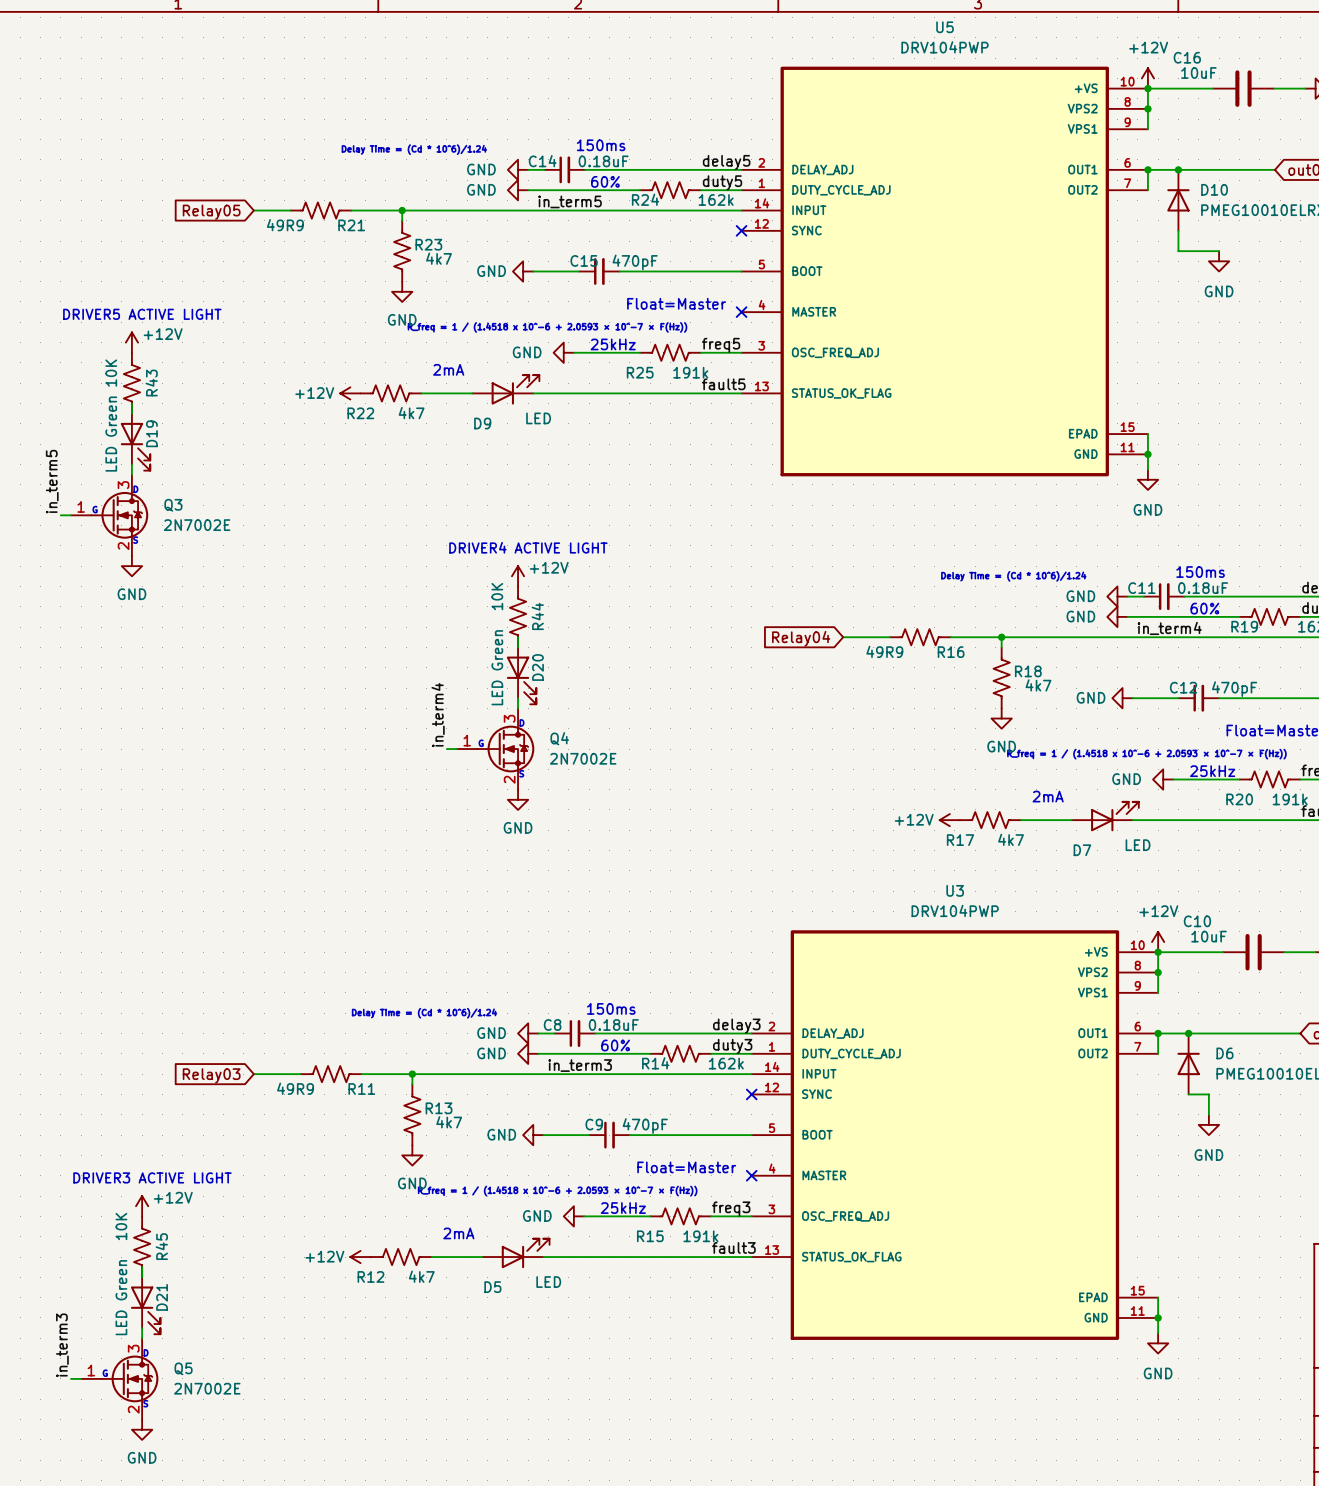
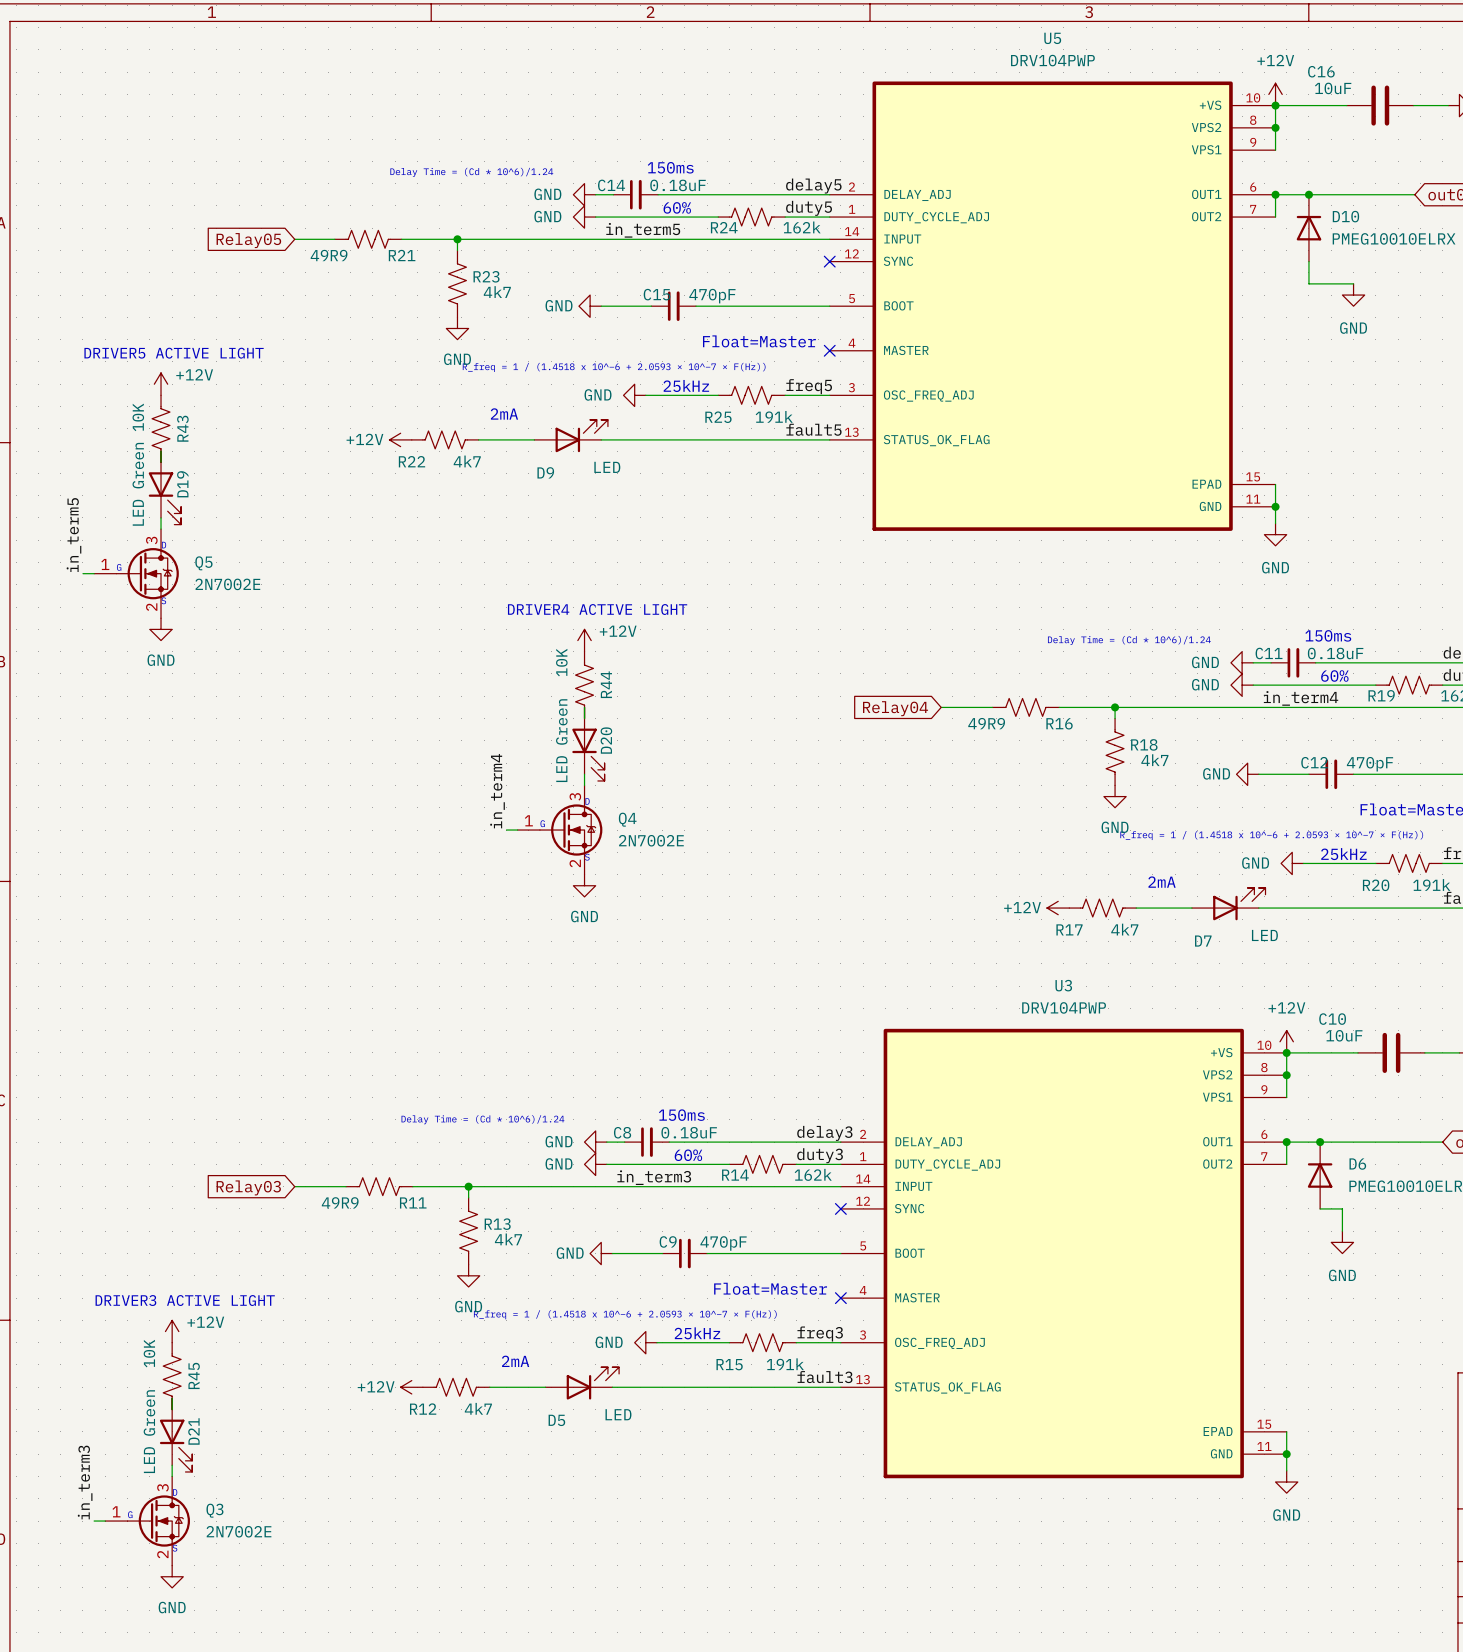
Q3 name: Q3 (173, 505) -> Q5 (203, 563)
Q5 name: Q5 (183, 1368) -> Q3 (214, 1510)

